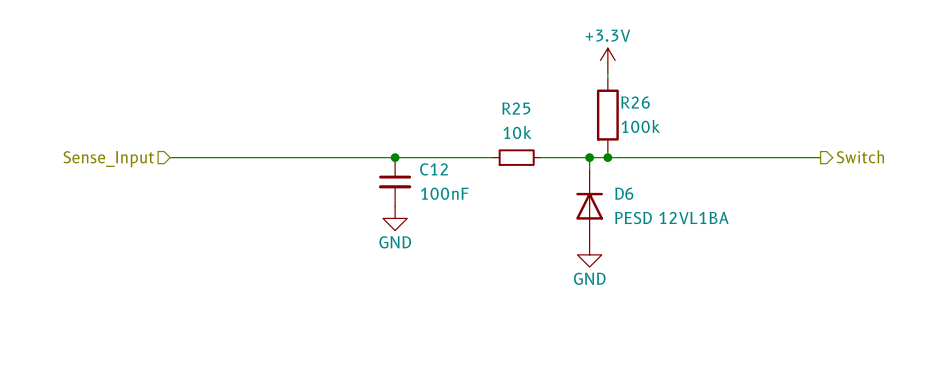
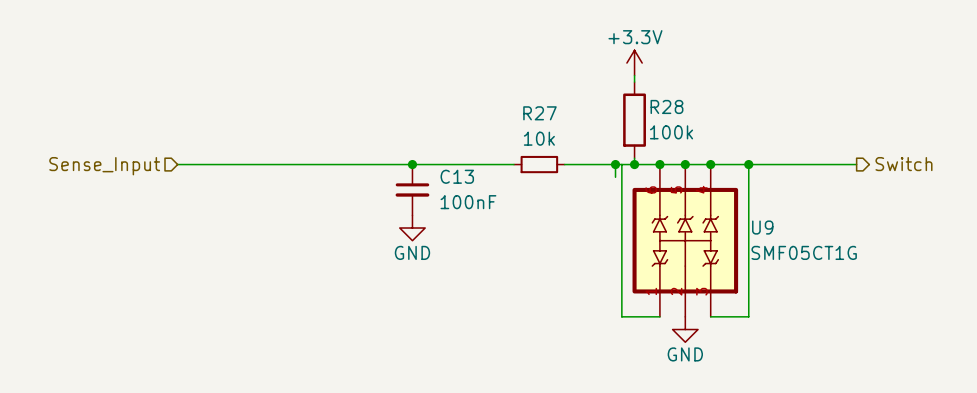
R26 name: R26 (635, 102) -> R28 (666, 106)
R25 name: R25 (516, 108) -> R27 (539, 113)
wire: none -> (621, 164) (621, 316) (659, 316)
junction: none -> (659, 164)
junction: none -> (685, 164)
junction: none -> (710, 164)
wire: none -> (748, 164) (748, 316) (710, 316)
junction: none -> (748, 164)
C12 name: C12 (434, 169) -> C13 (457, 176)
D6: PESD 12VL1BA (589, 206) -> none
U9: none -> SMF05CT1G (685, 240)
power symbol position: GND (589, 254) -> GND (685, 329)

